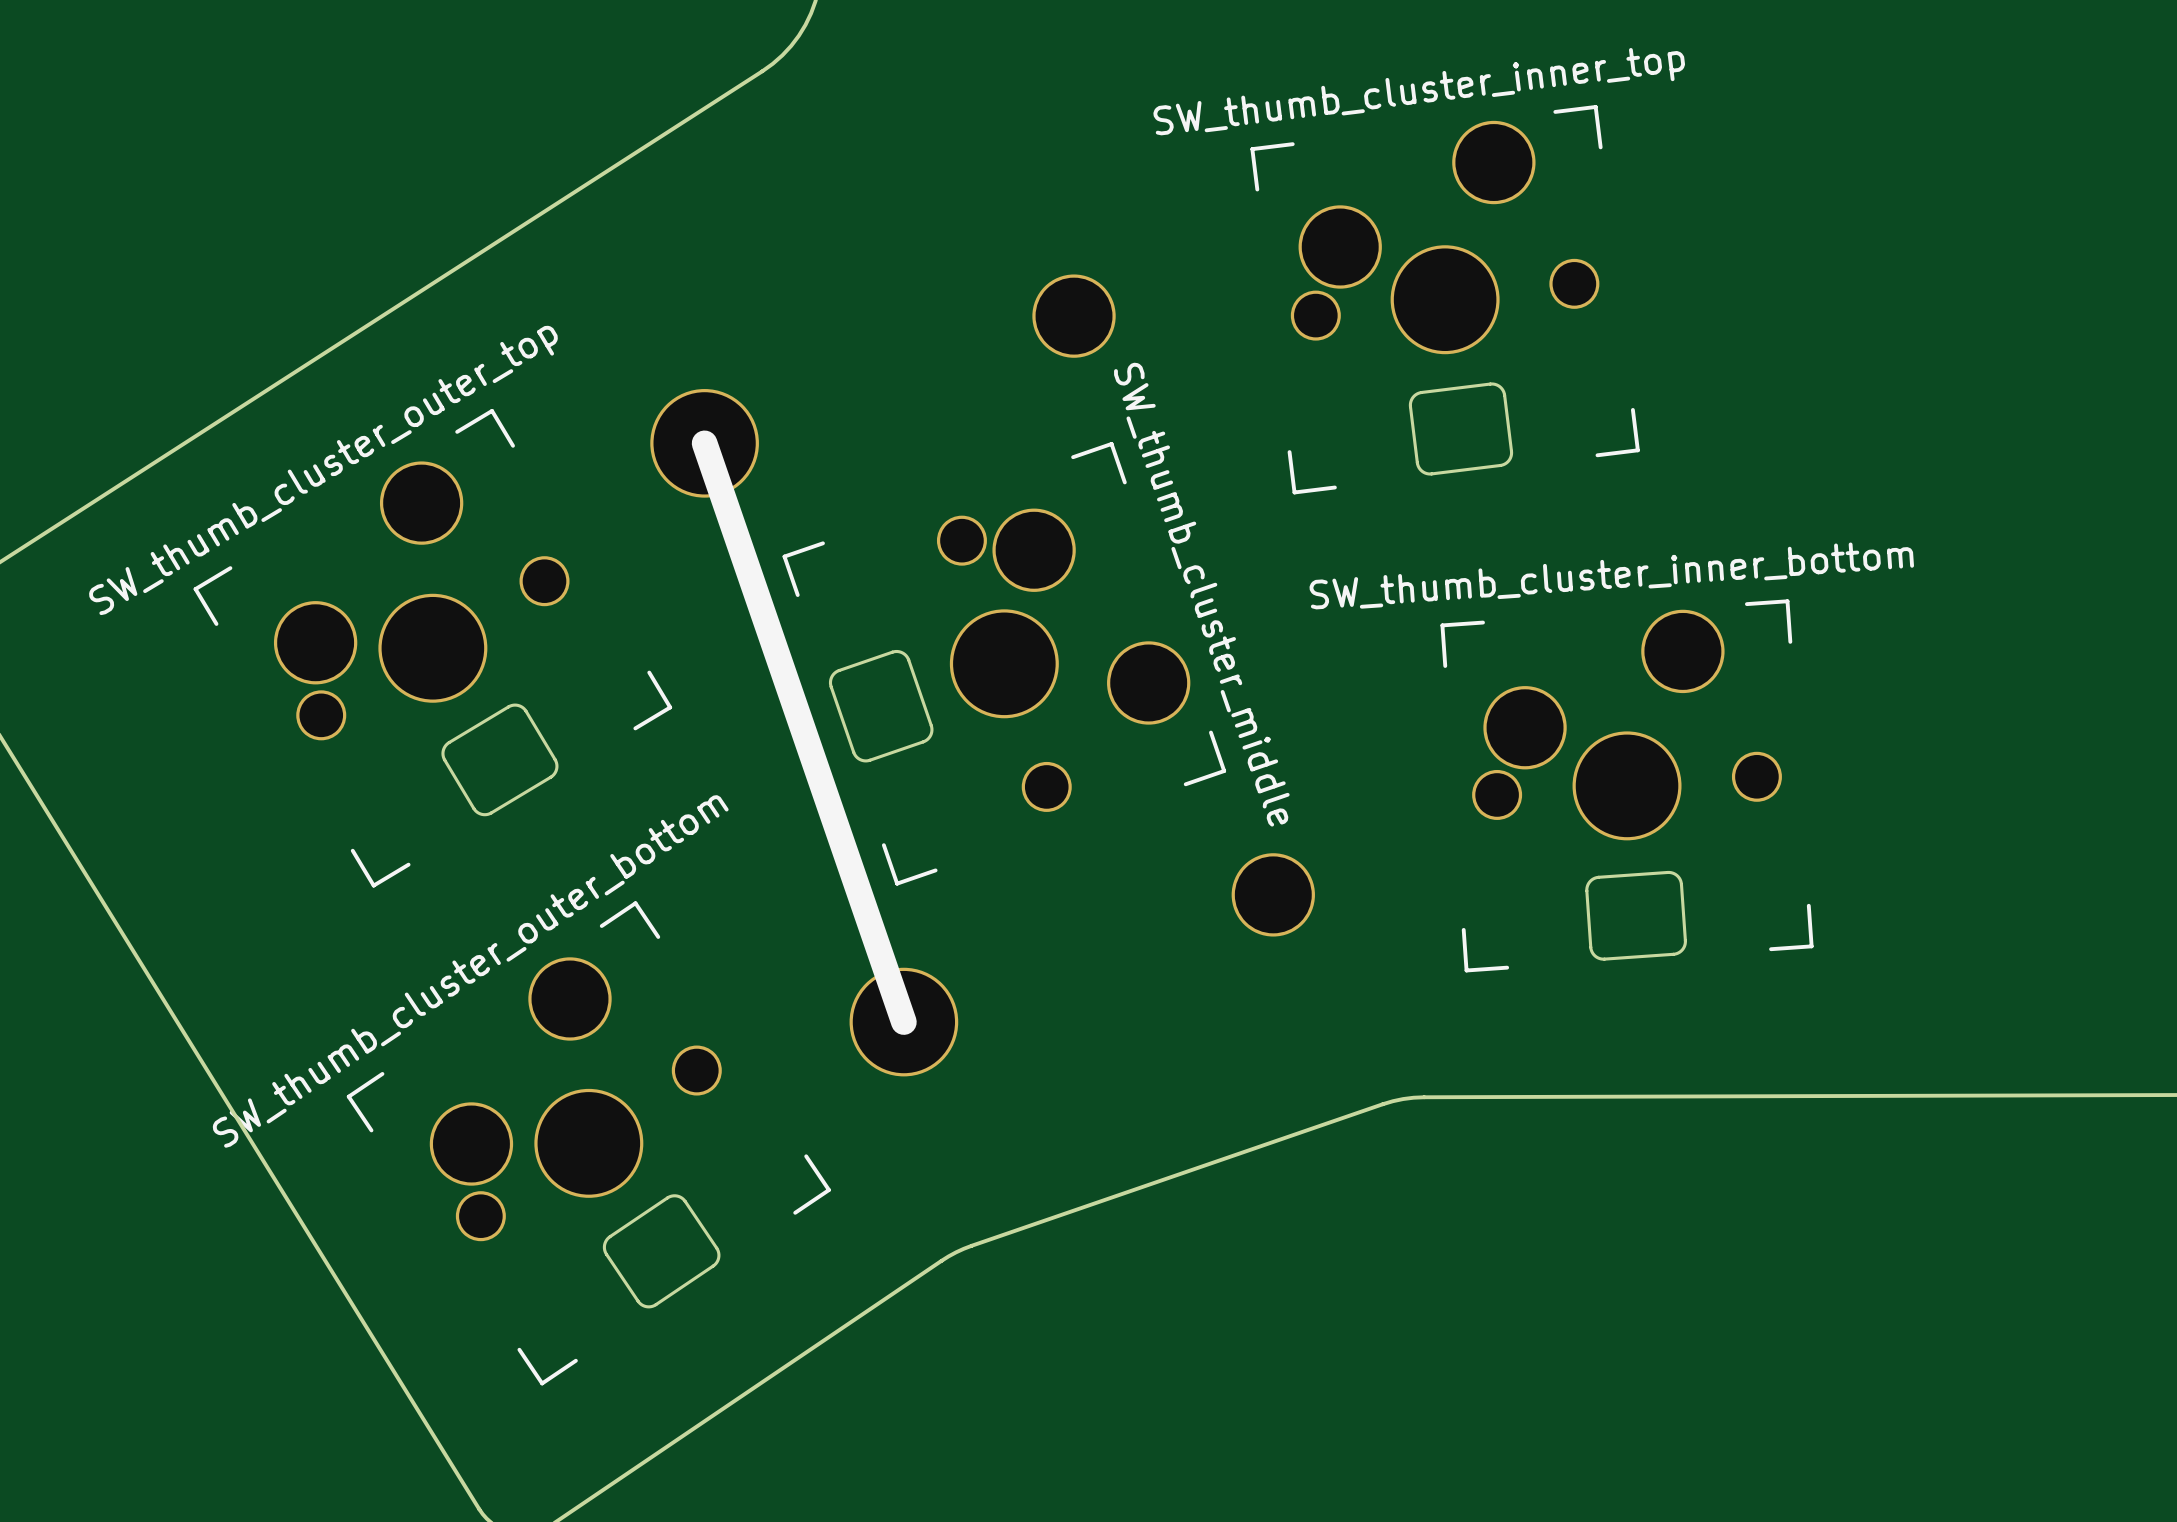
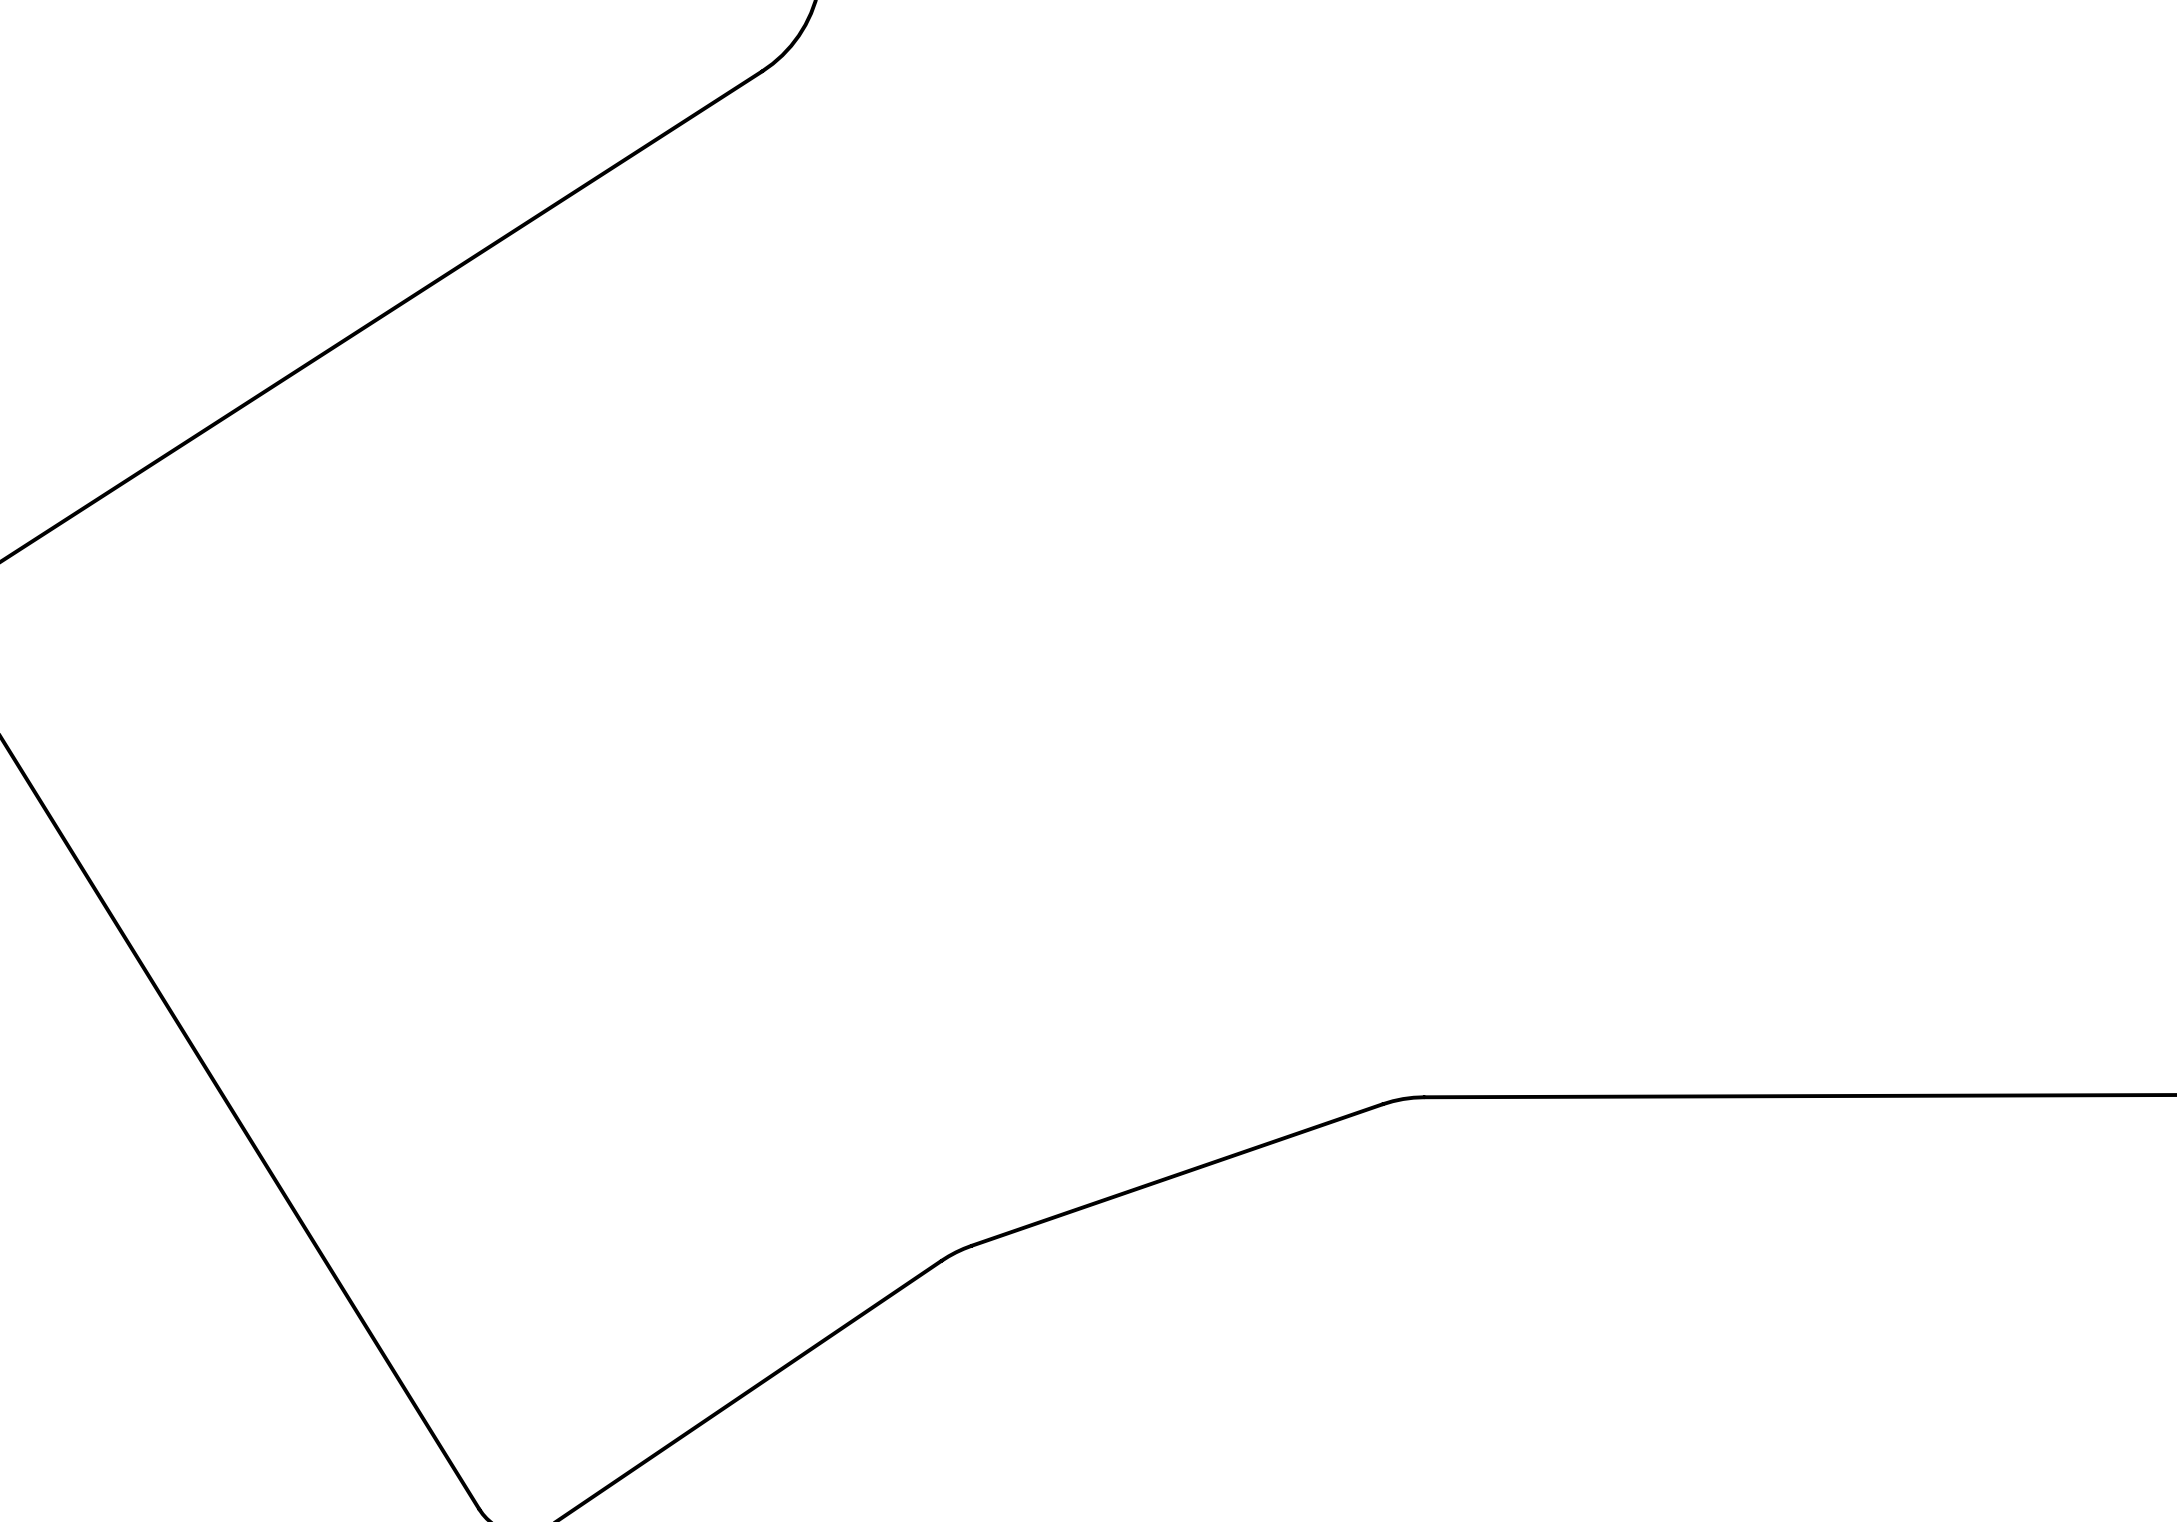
SW_thumb_cluster_inner_top: (1445, 299) -> none
SW_thumb_cluster_outer_top: (432, 648) -> none
SW_thumb_cluster_middle: (982, 675) -> none
SW_thumb_cluster_inner_bottom: (1627, 785) -> none
SW_thumb_cluster_outer_bottom: (588, 1143) -> none

